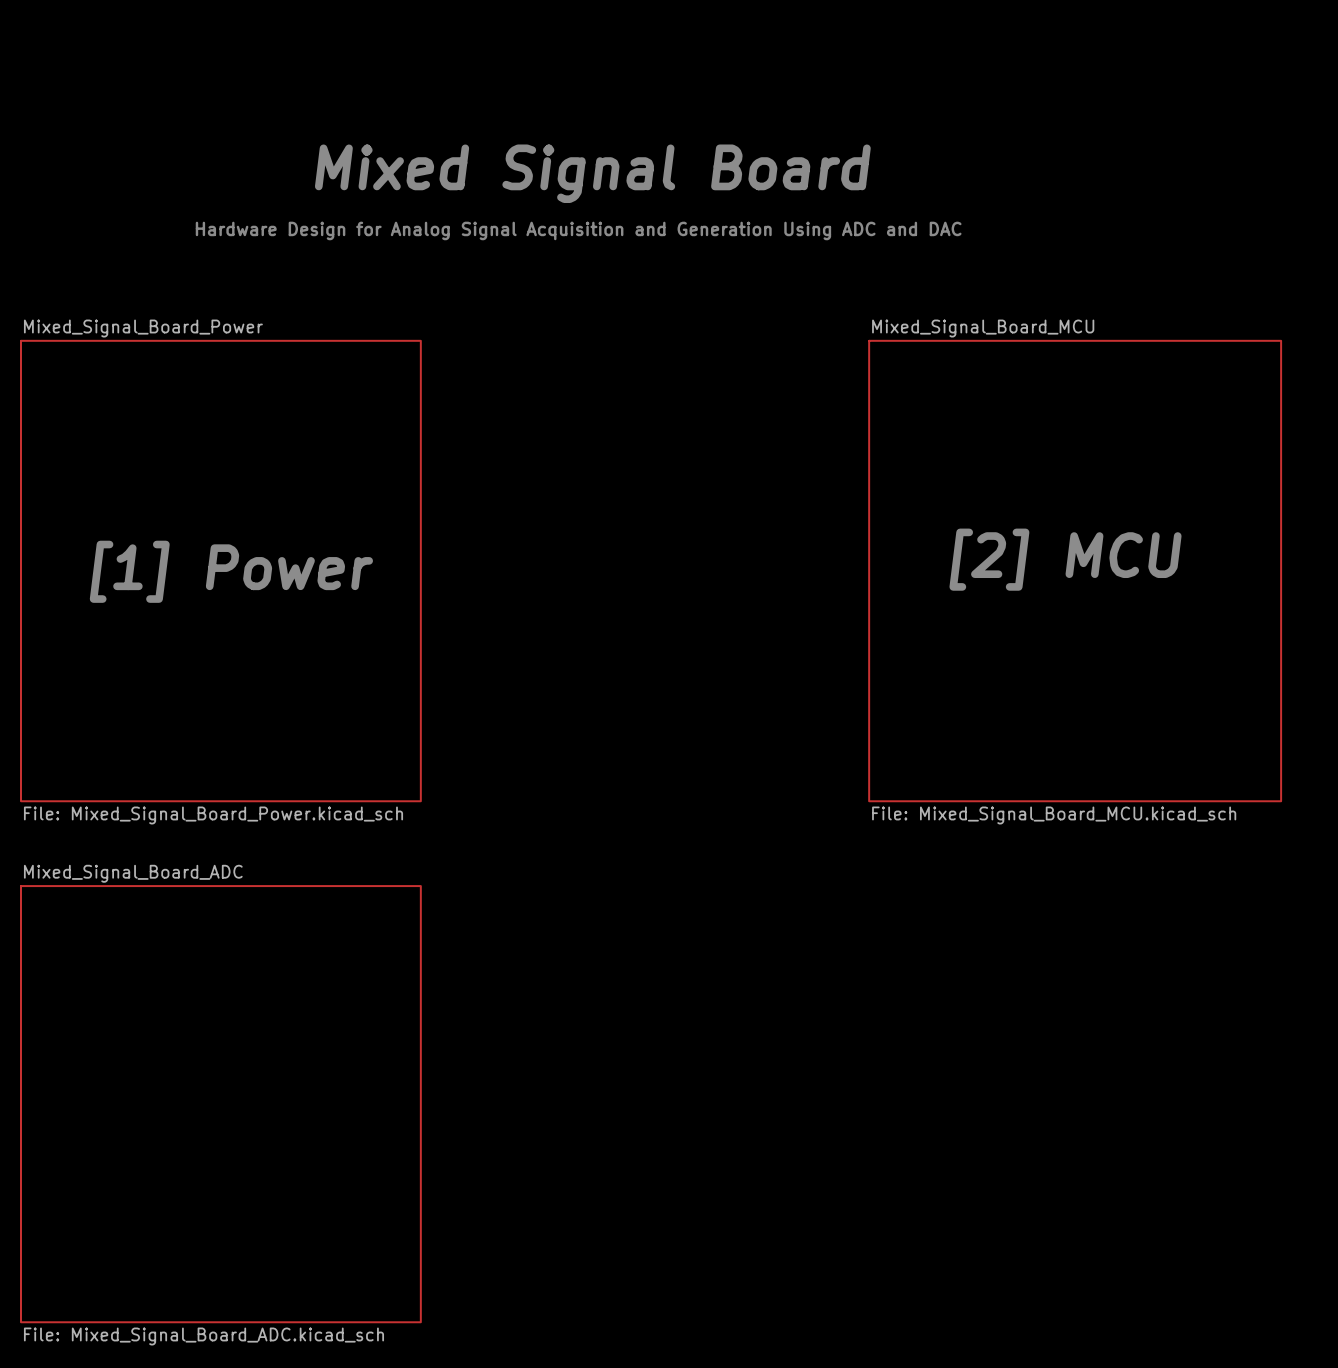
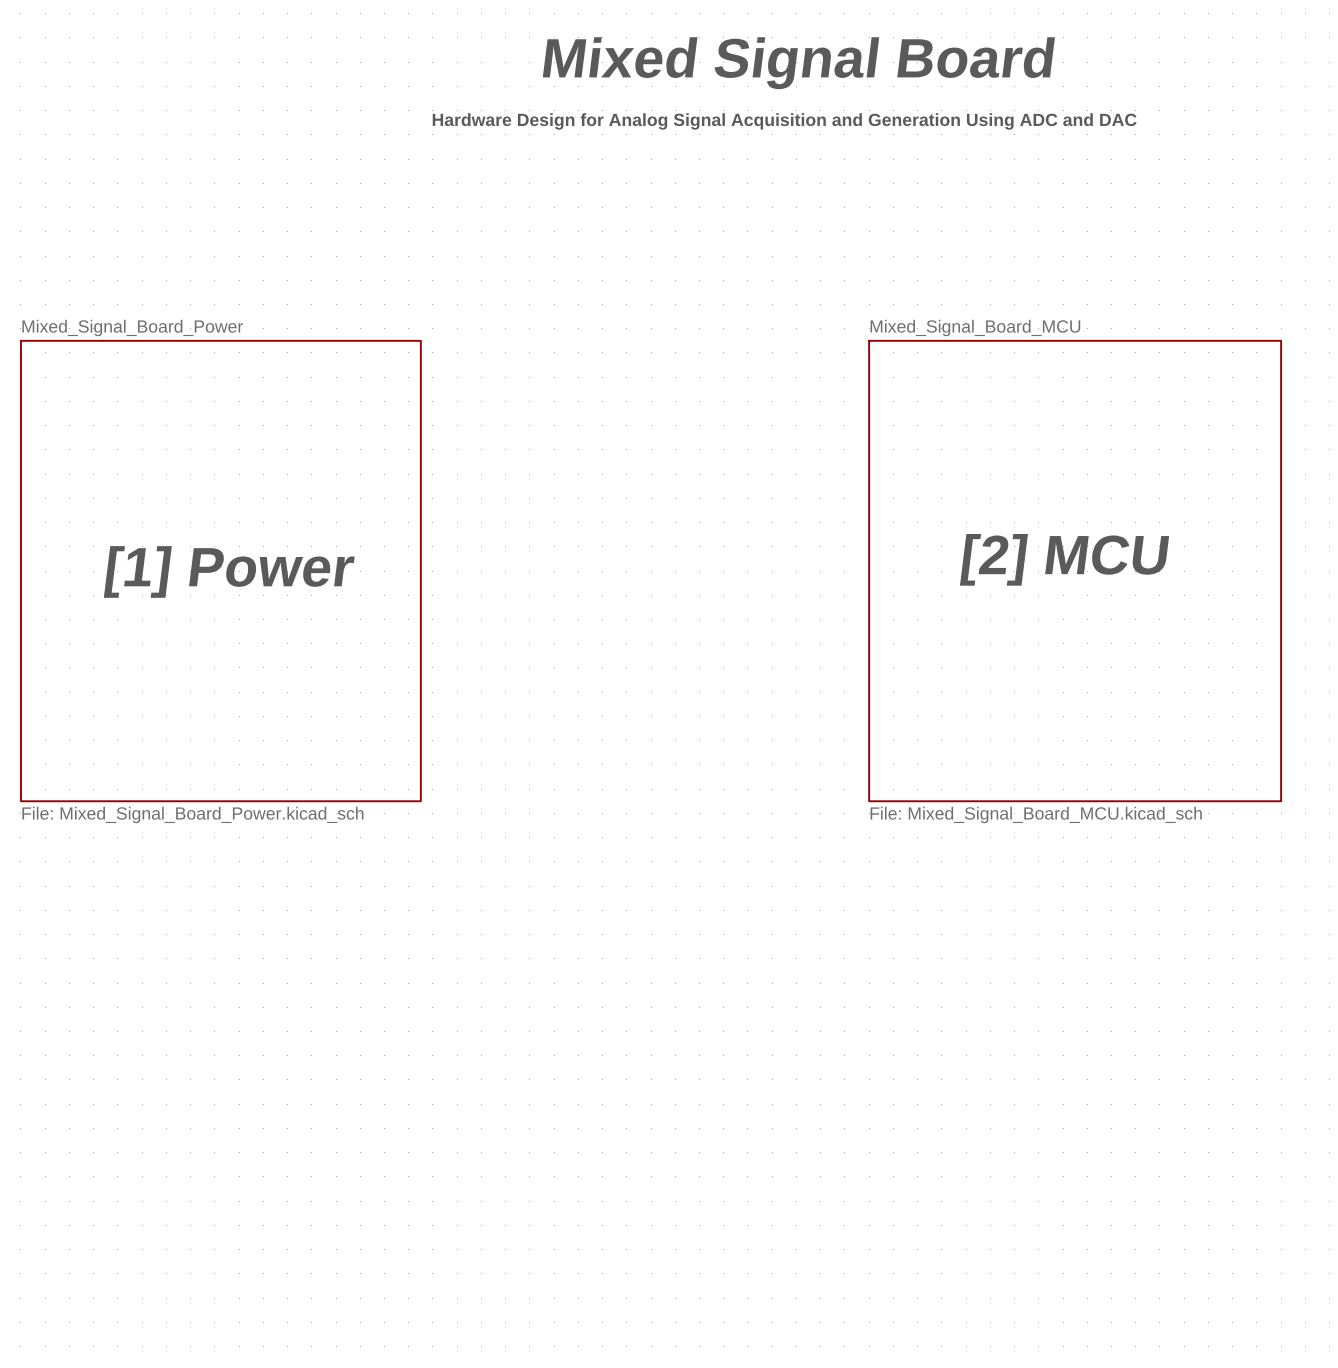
text position: Mixed Signal Board (592, 173) -> Mixed Signal Board (798, 63)
text position: Hardware Design for Analog Signal Acquisition and Generation Using ADC and DAC (578, 230) -> Hardware Design for Analog Signal Acquisition and Generation Using ADC and DAC (784, 121)
sheet Mixed_Signal_Board_ADC: File: Mixed_Signal_Board_ADC.kicad_sch (220, 1104) -> none

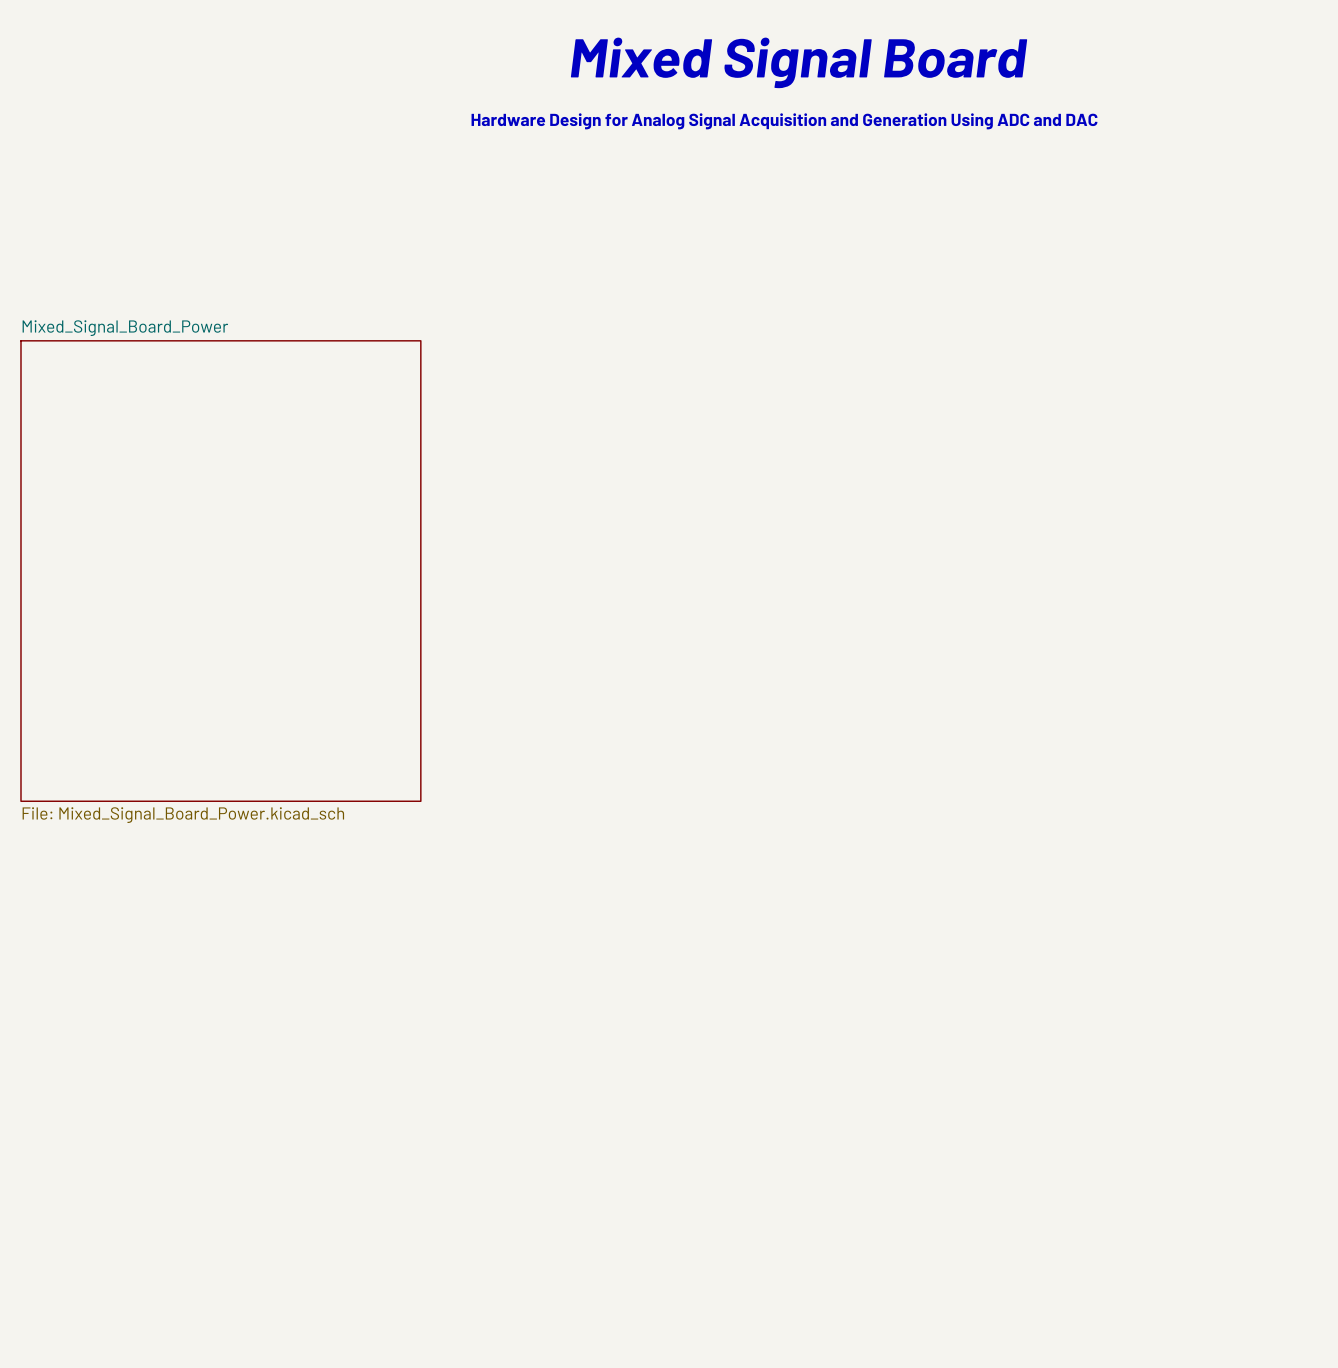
text: [2] MCU (1064, 559) -> none
text: [1] Power (229, 571) -> none
sheet Mixed_Signal_Board_MCU: File: Mixed_Signal_Board_MCU.kicad_sch (1075, 571) -> none

